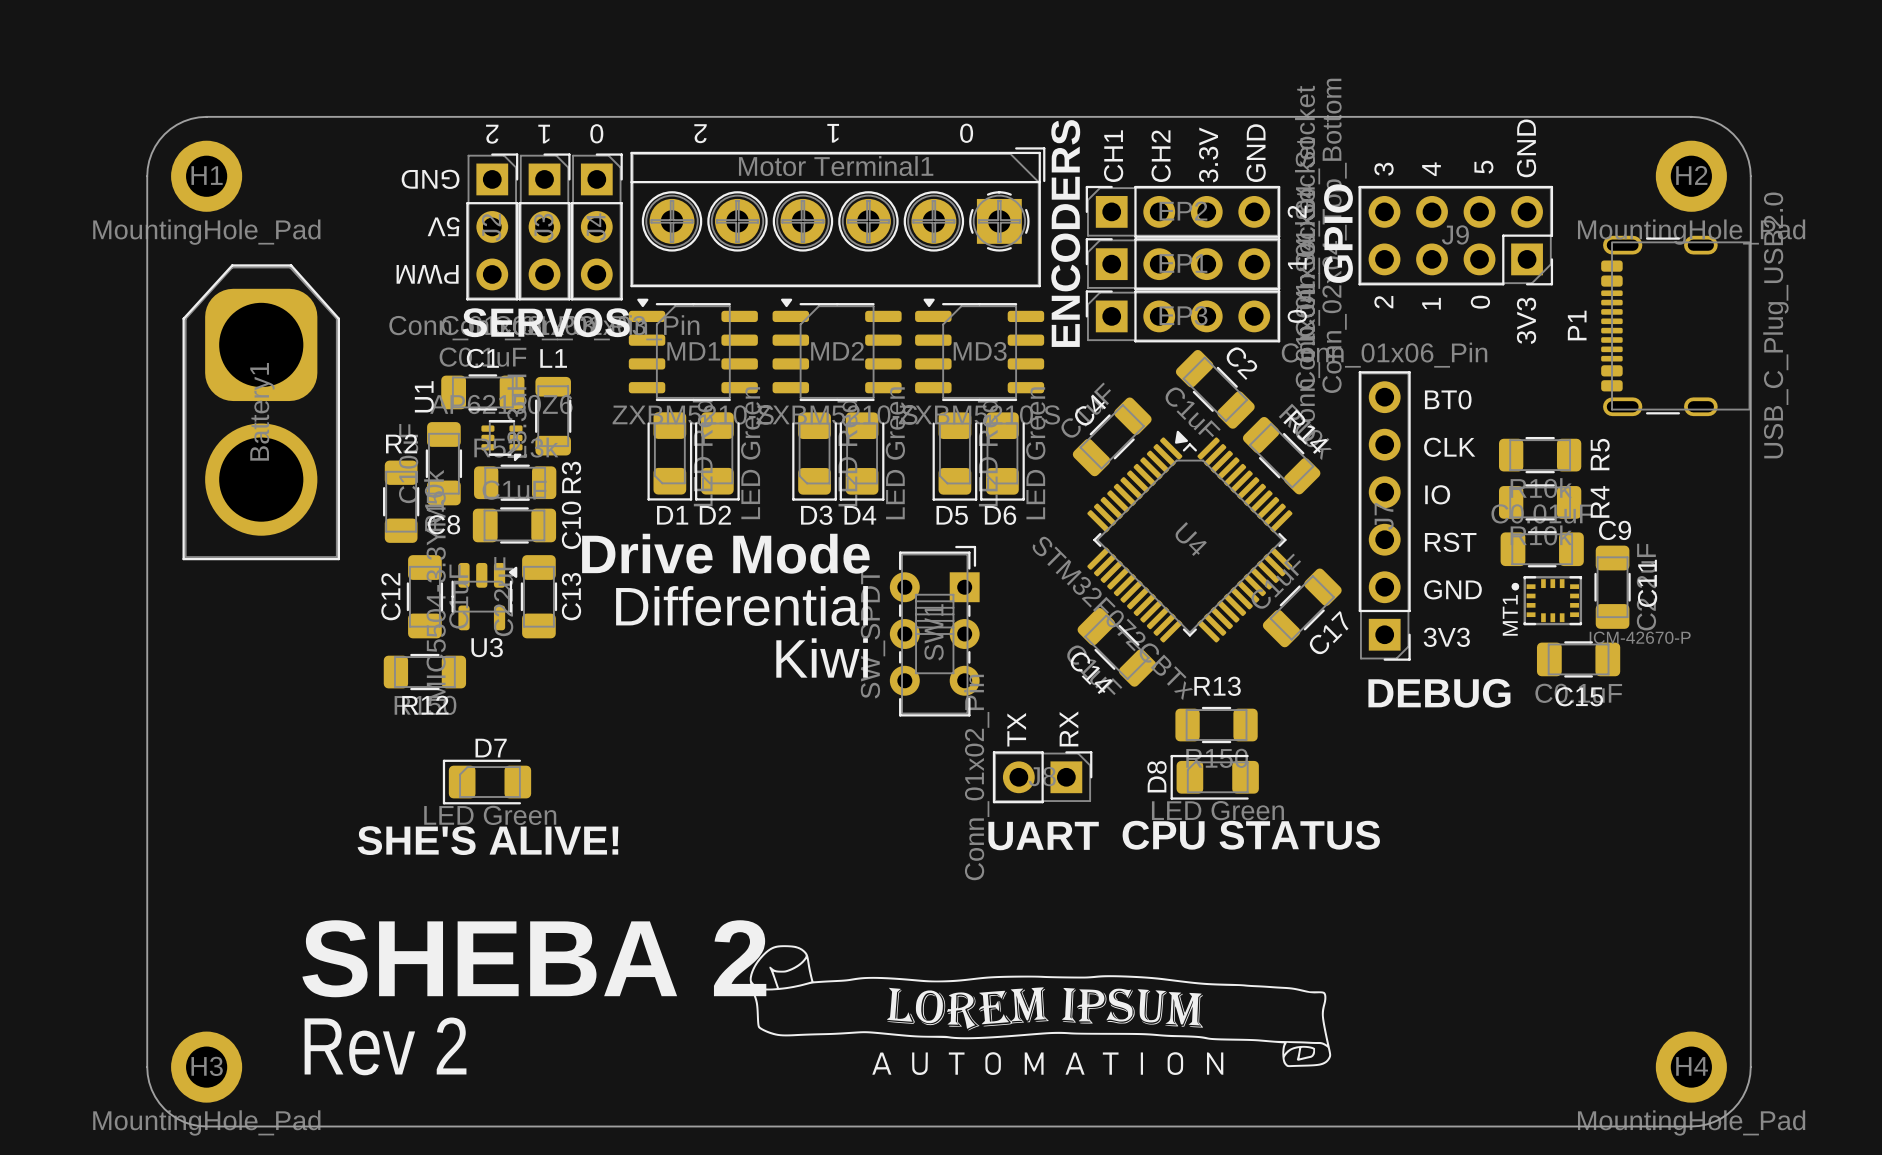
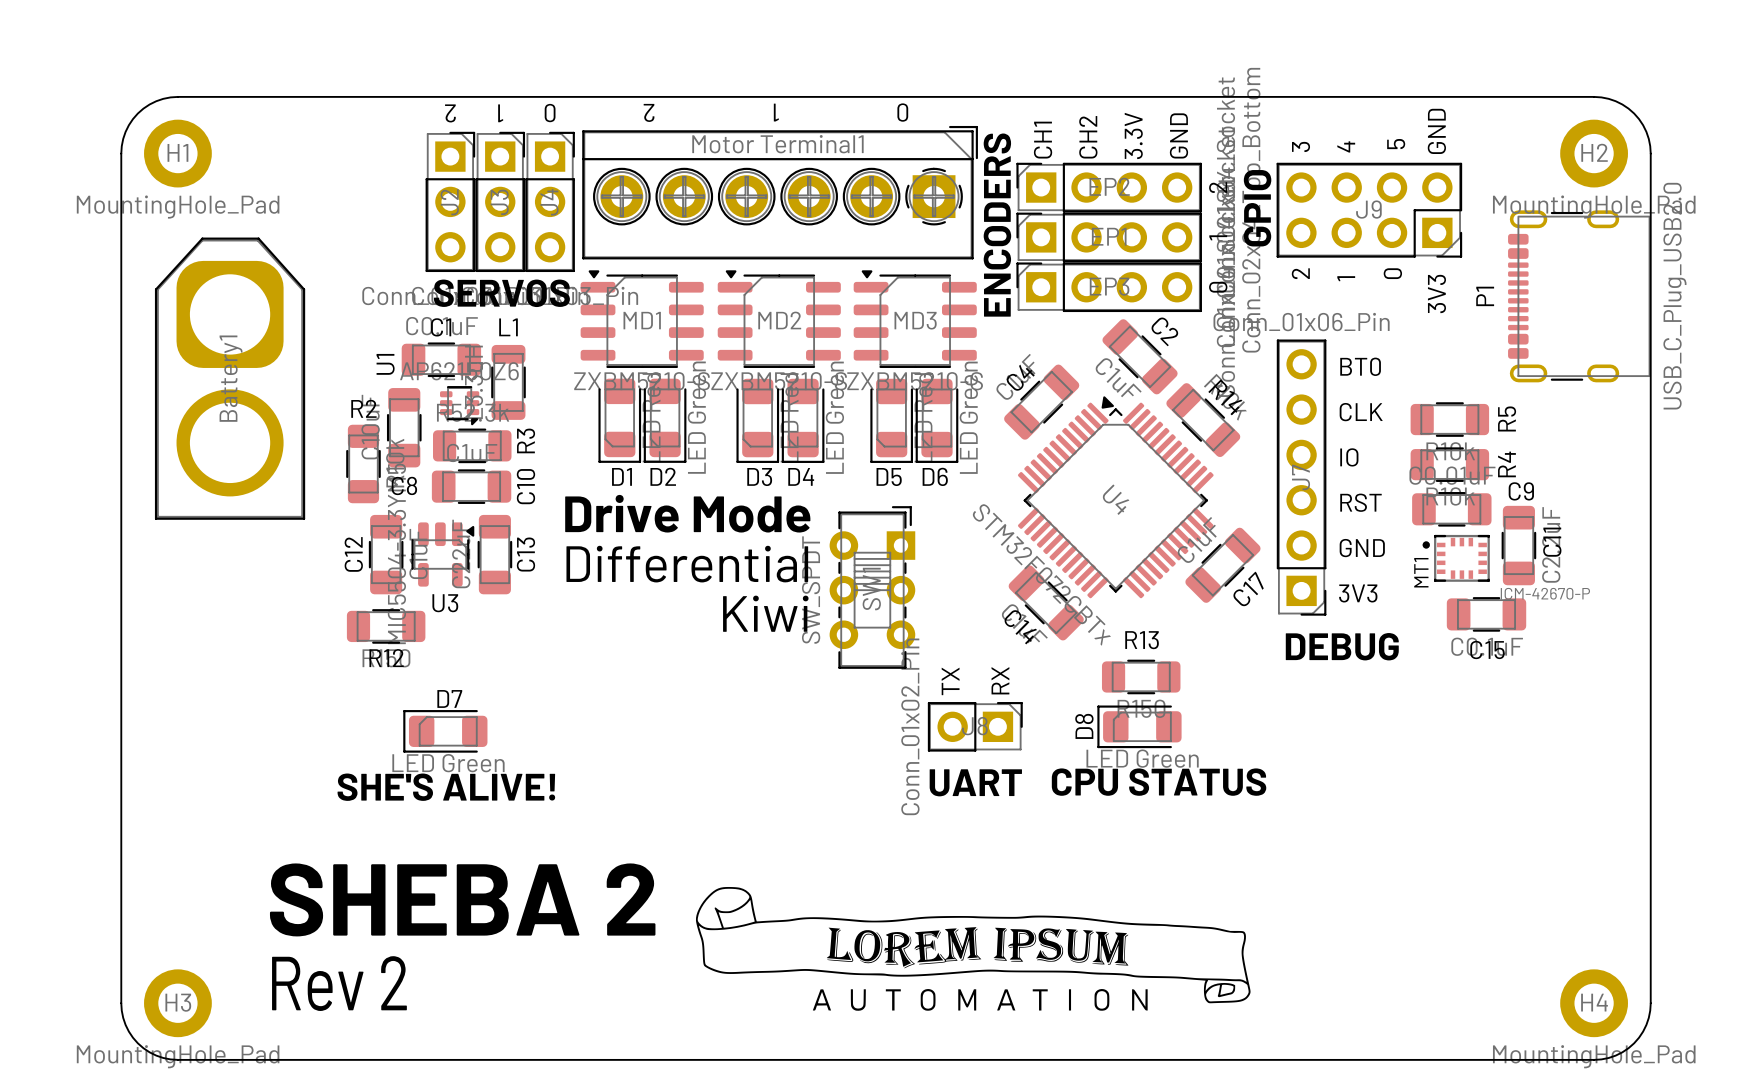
text: GND (430, 179) -> none
text: 5V (443, 226) -> none
text: PWM (427, 274) -> none

